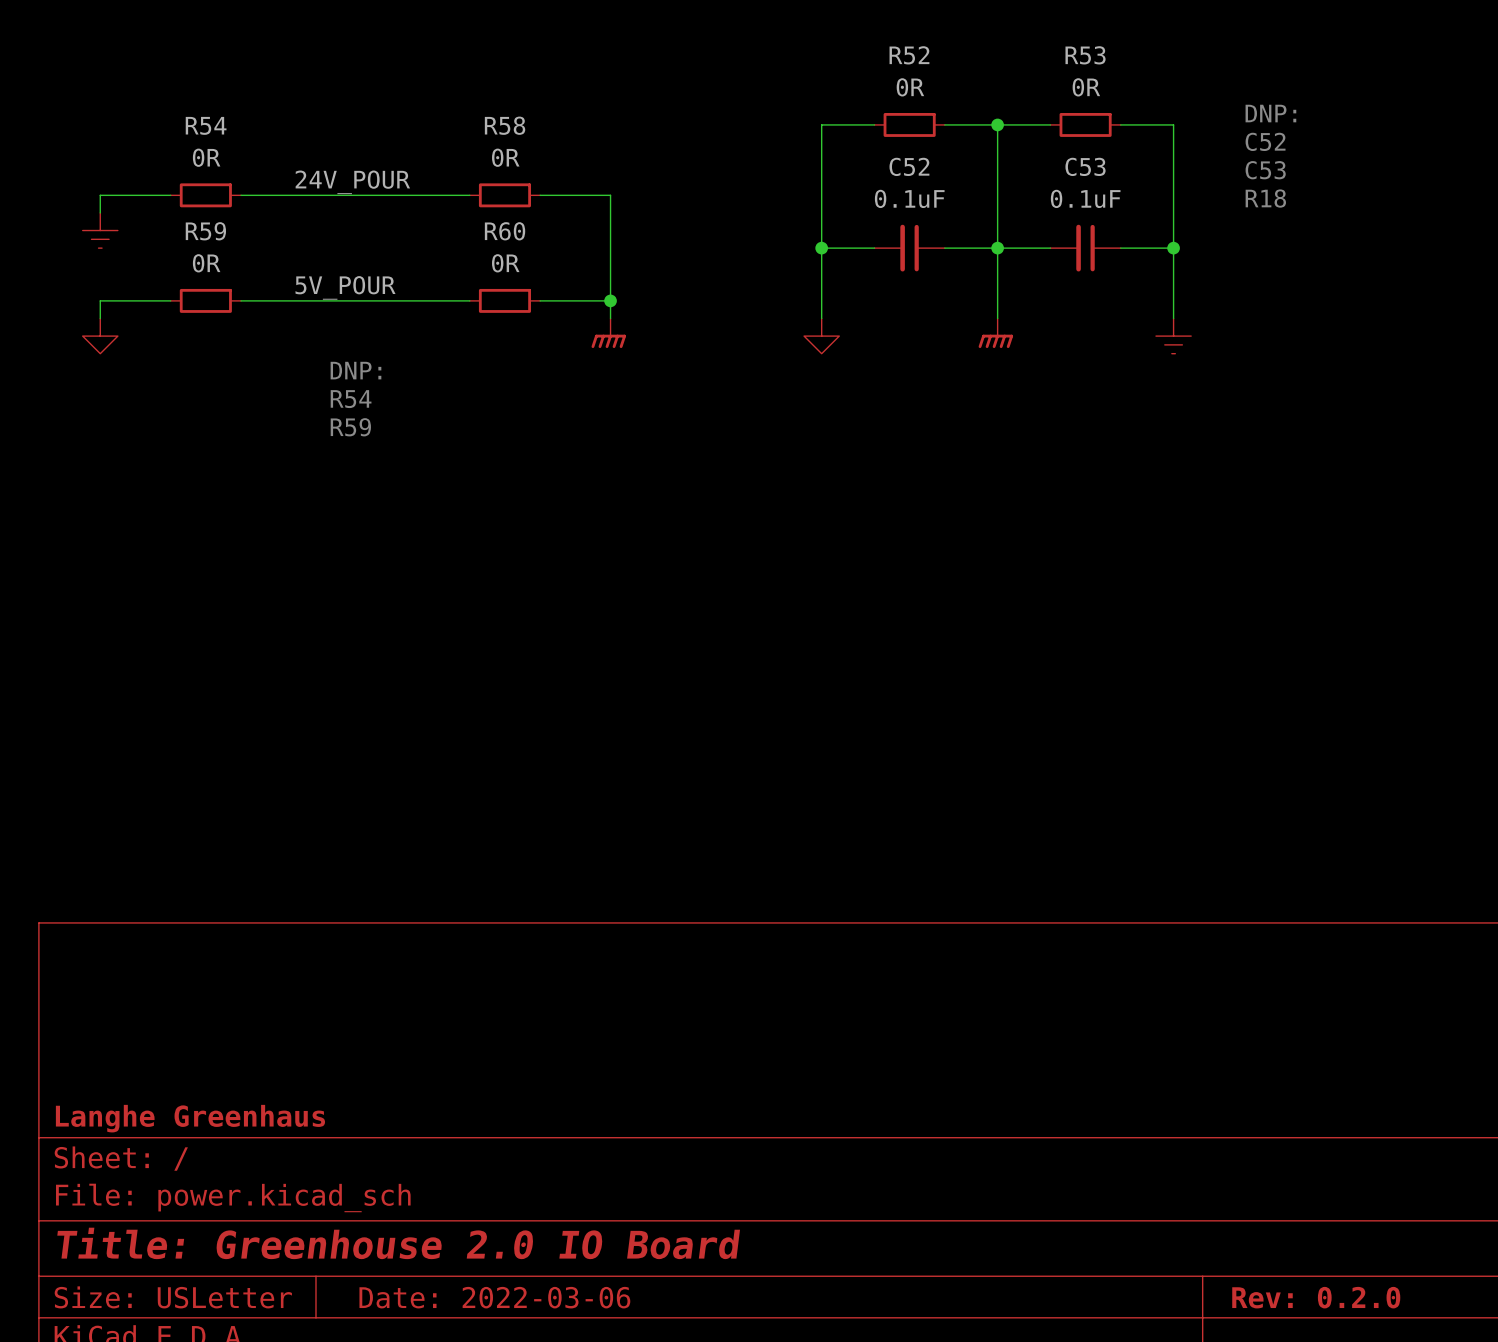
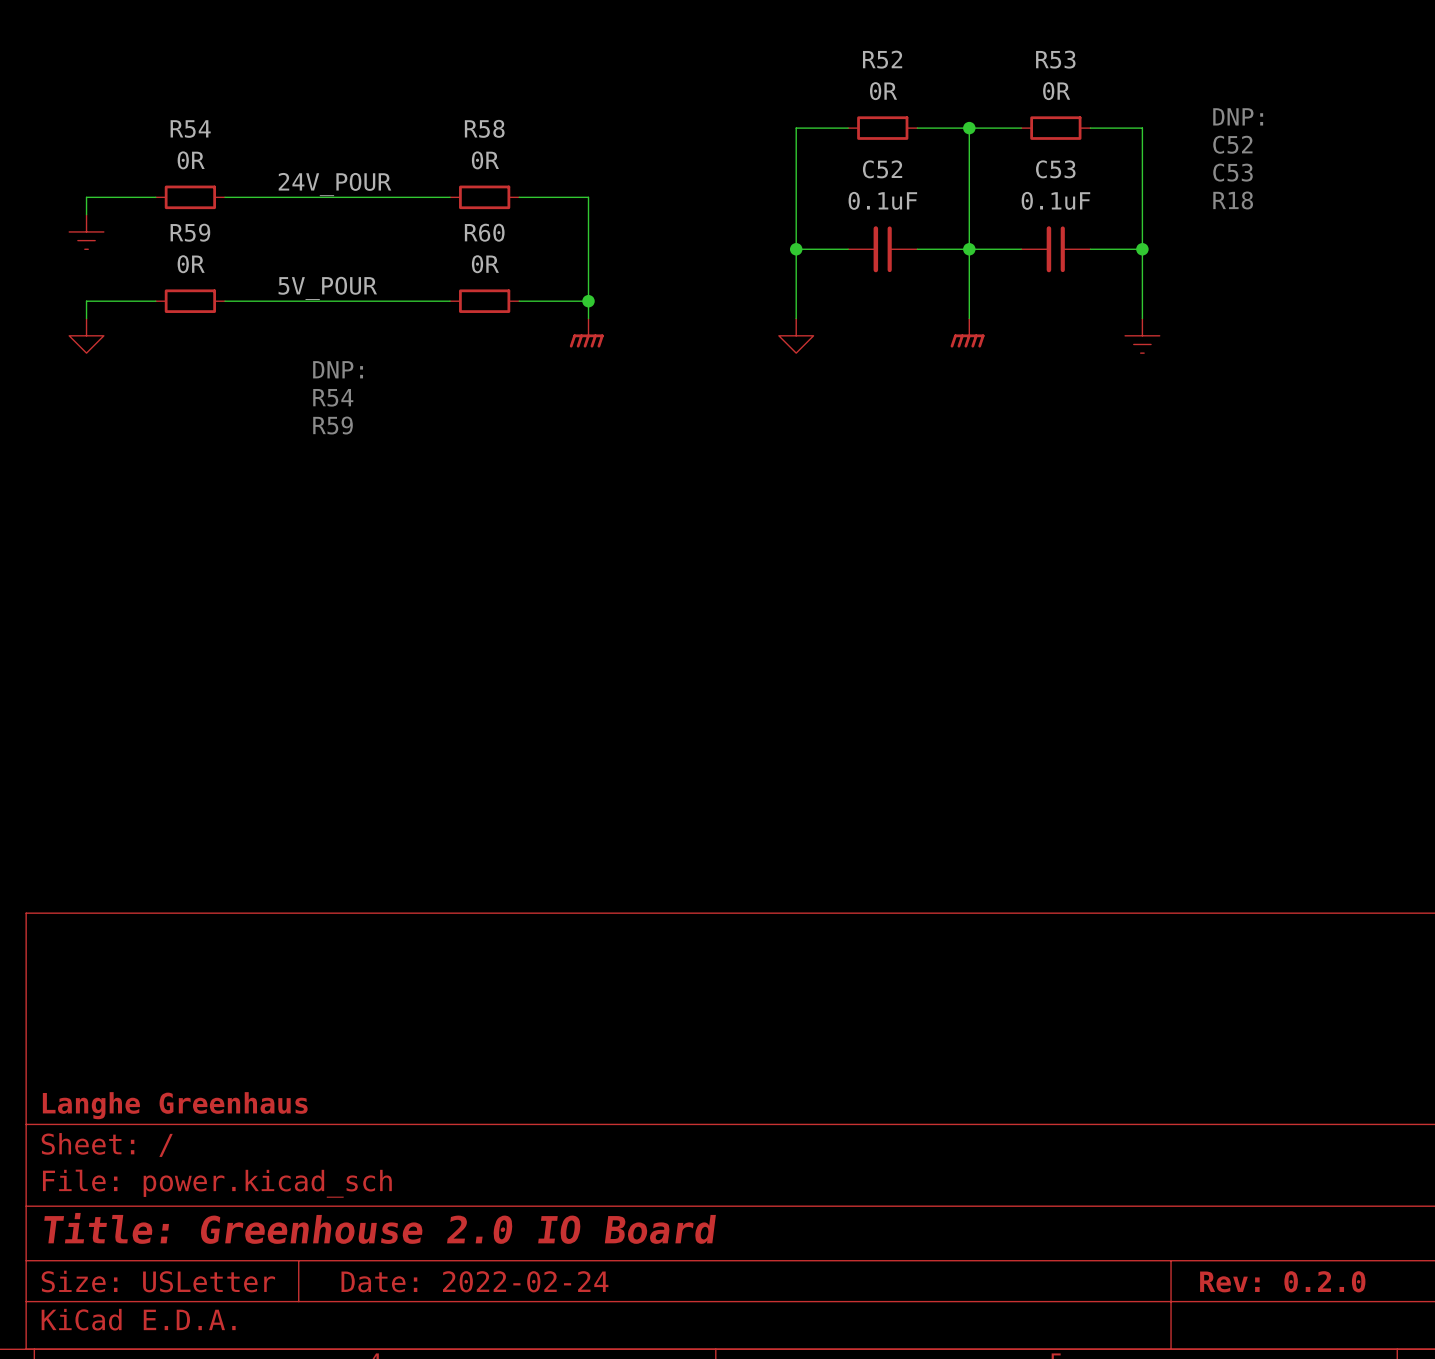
title block: Date: 2022-03-06 (494, 1297) -> Date: 2022-02-24 (474, 1281)

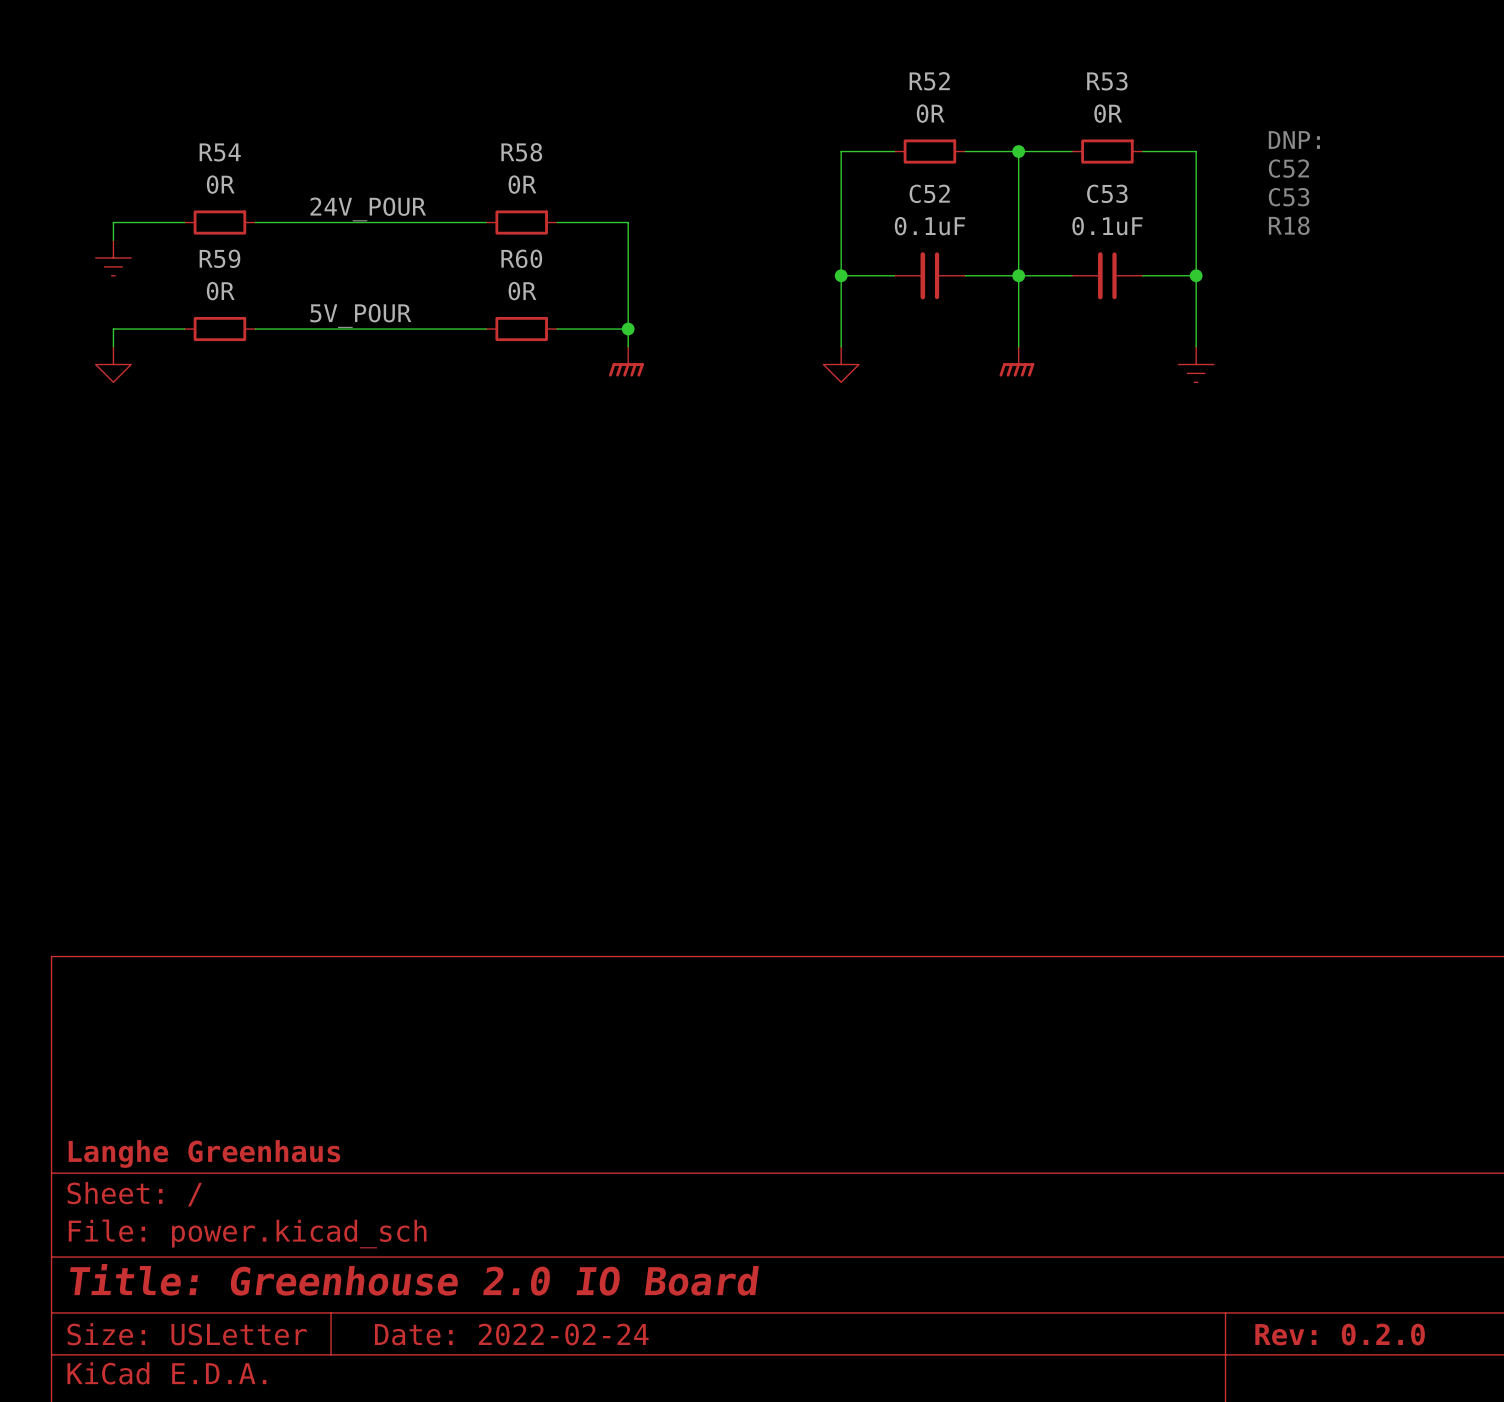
text: DNP: (338, 369) -> none
text: R54 (333, 397) -> none
text: R59 (333, 425) -> none

